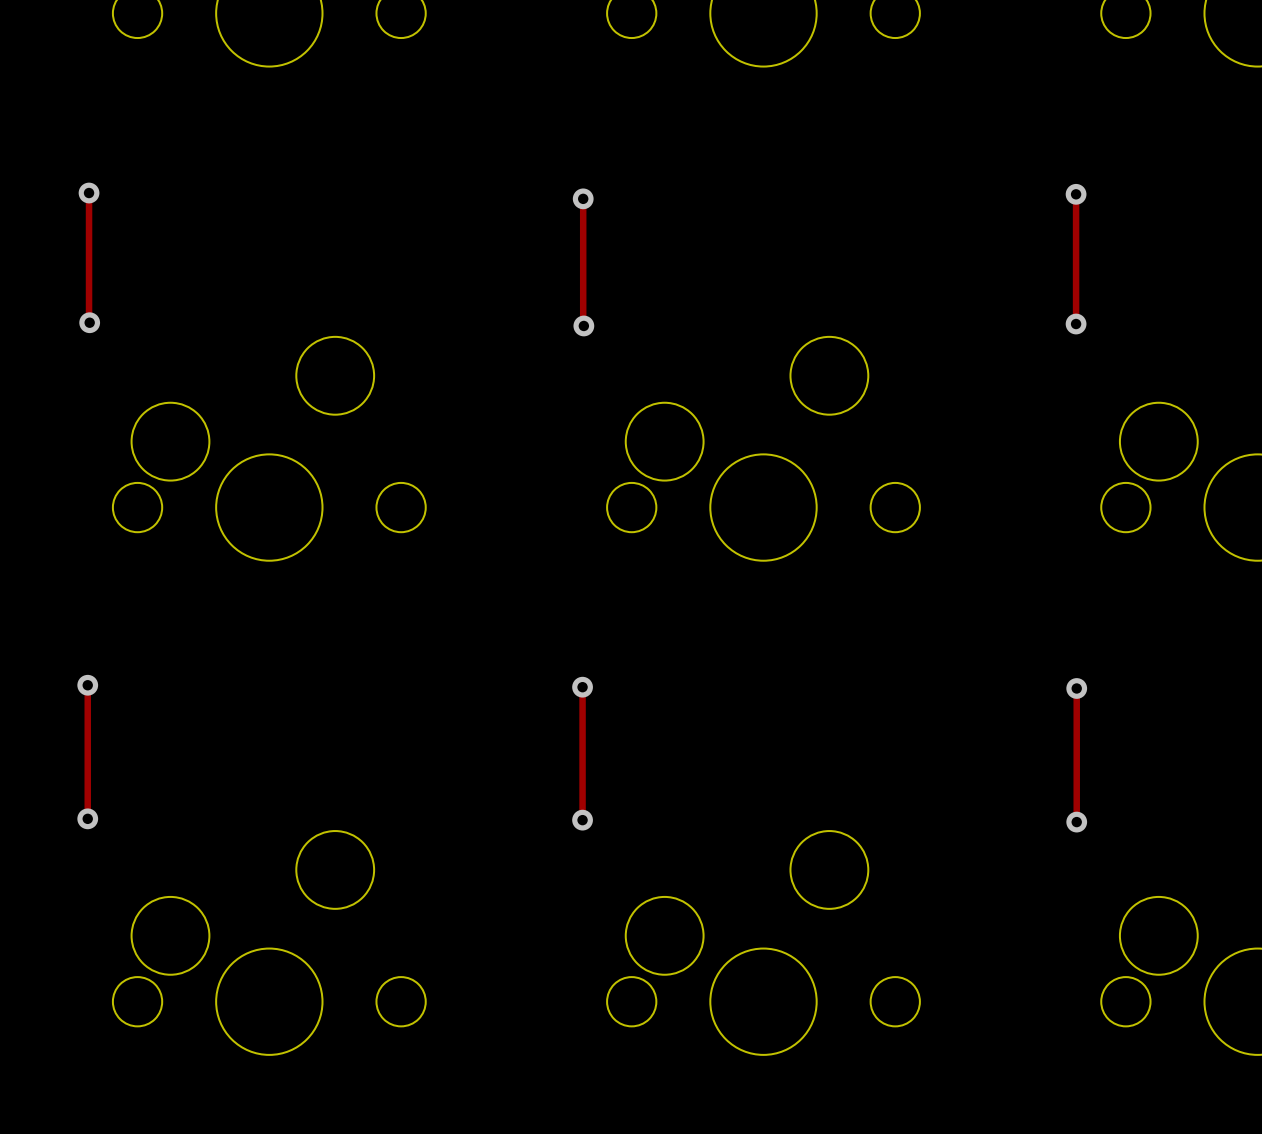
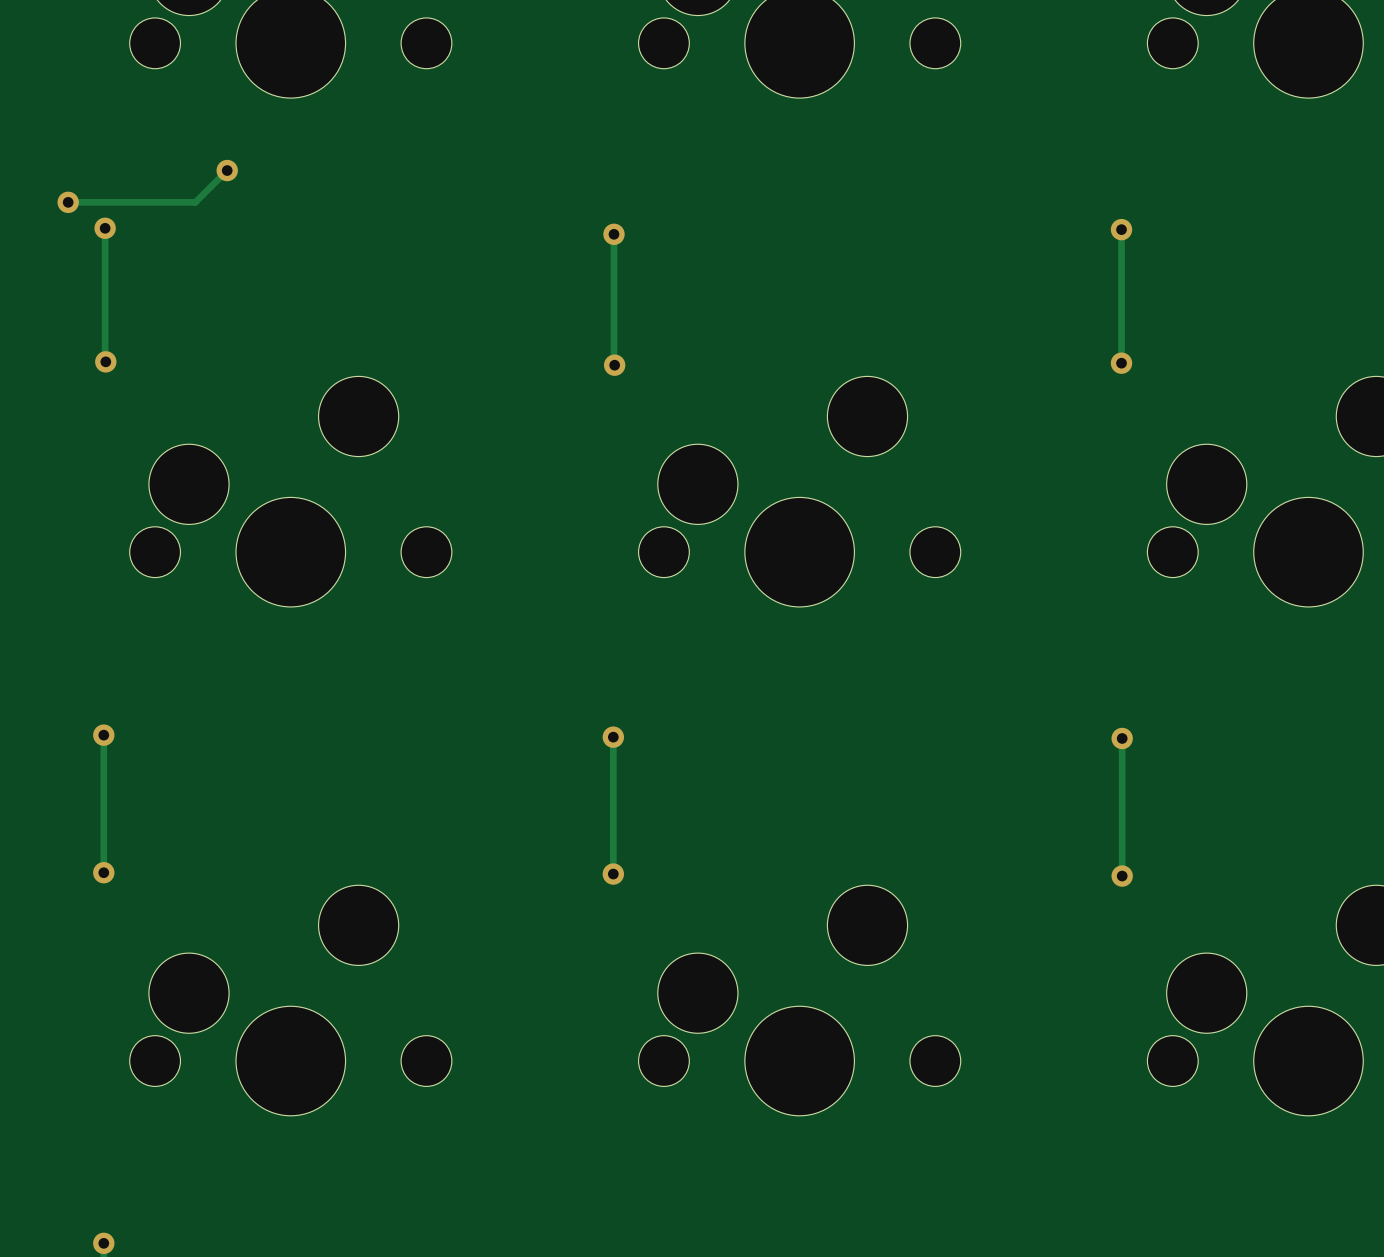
track: none -> (227, 170) (195, 202) (68, 202)
via: none -> (227, 170)
via: none -> (68, 202)

